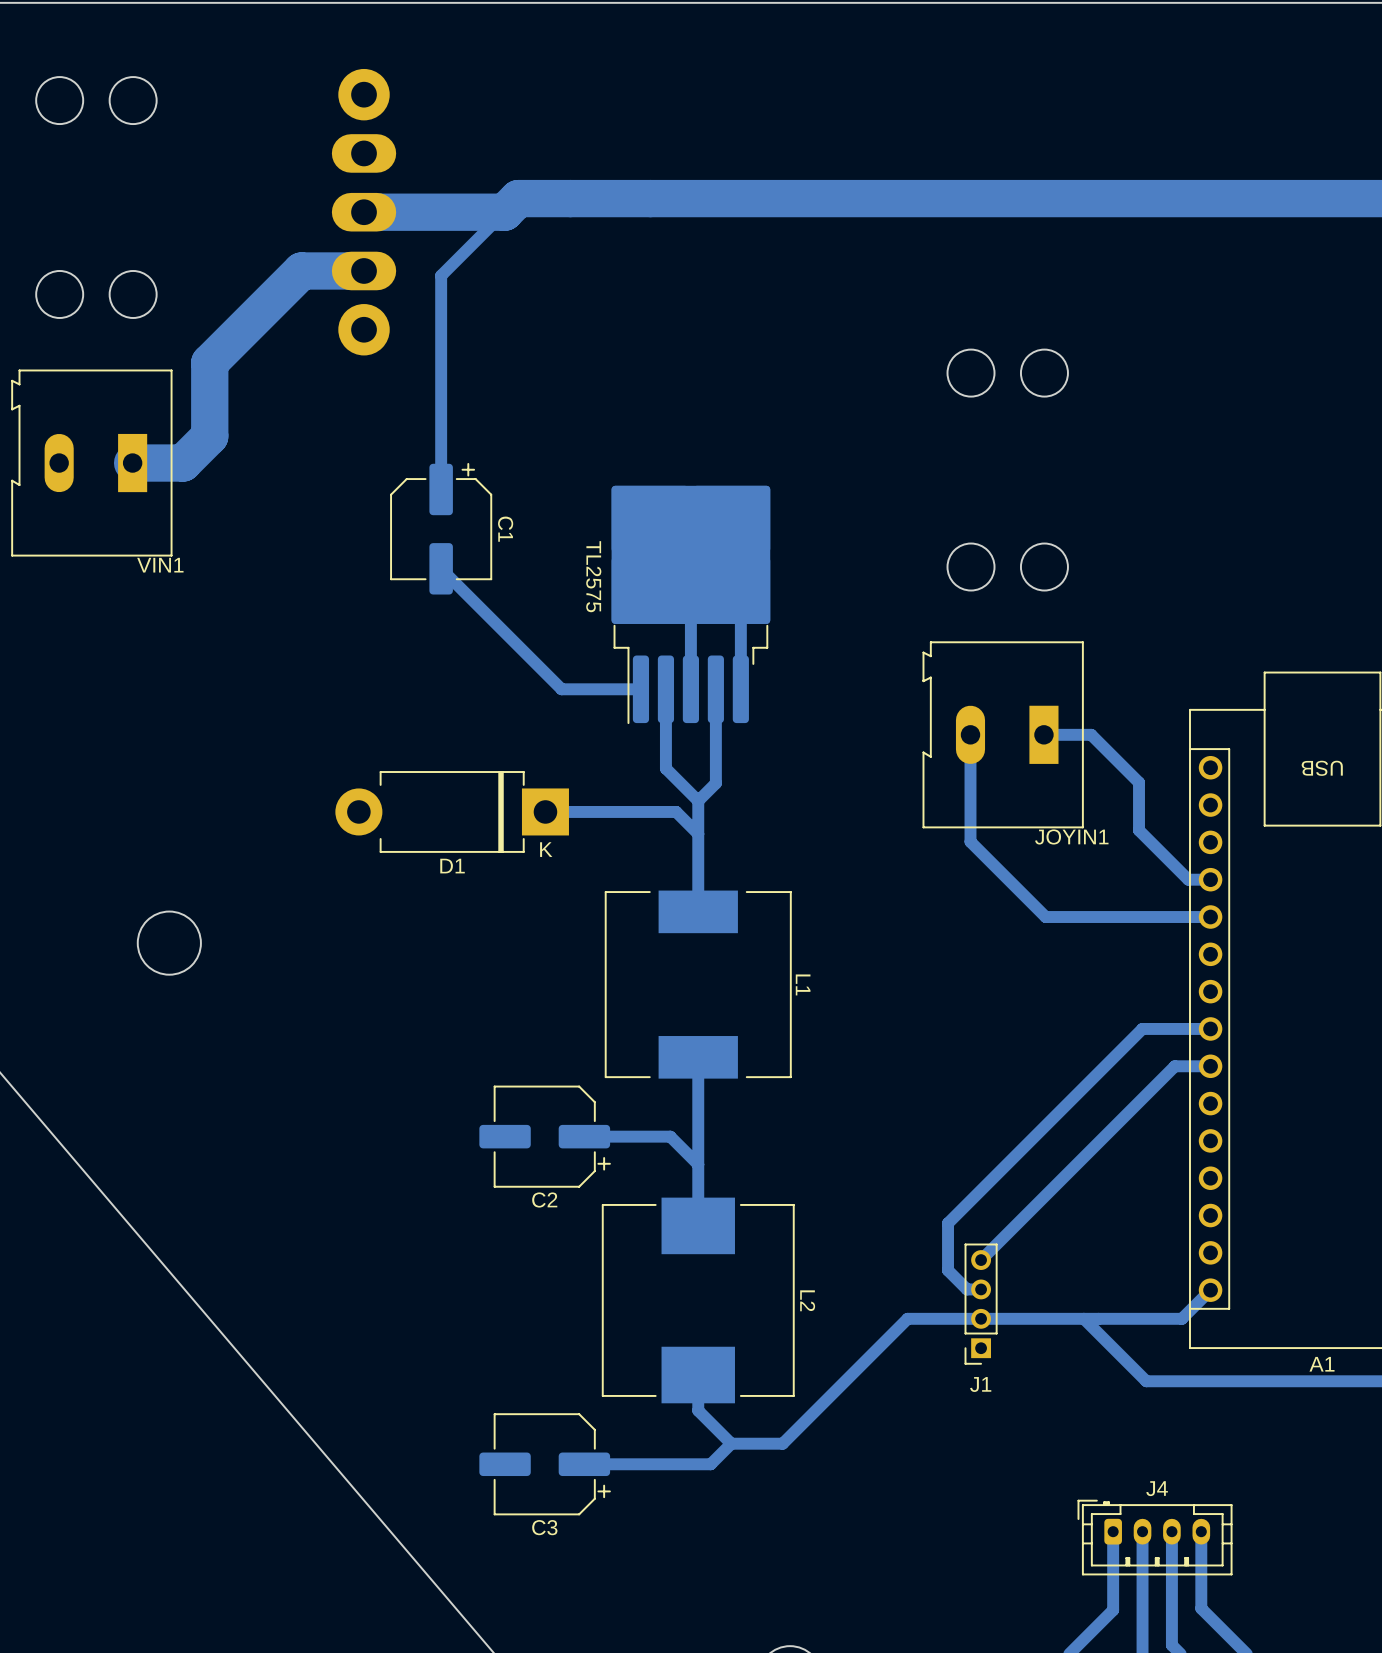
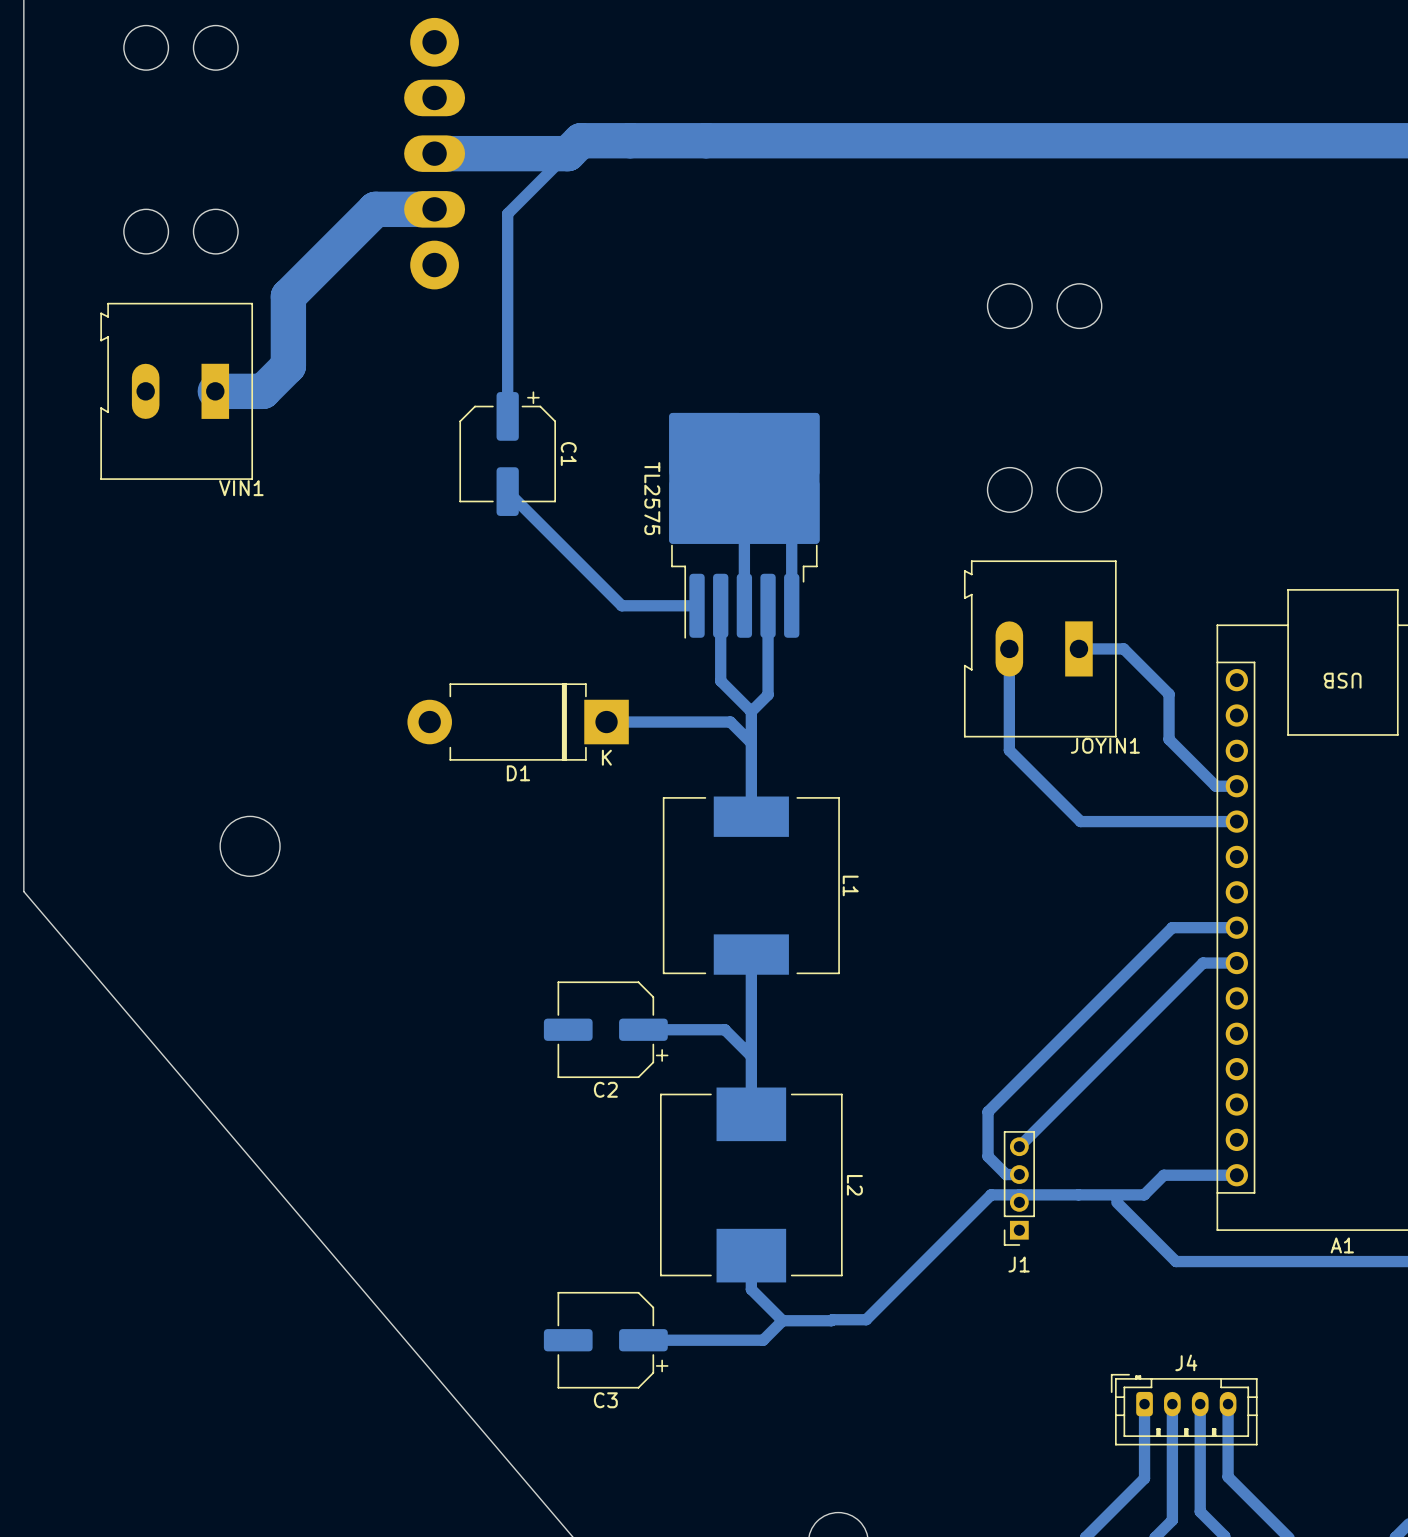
track: (1210, 1290) (1181, 1318) (907, 1318) (783, 1442) -> (1236, 1175) (1163, 1175) (1144, 1194) (991, 1194) (866, 1319) (832, 1319)

